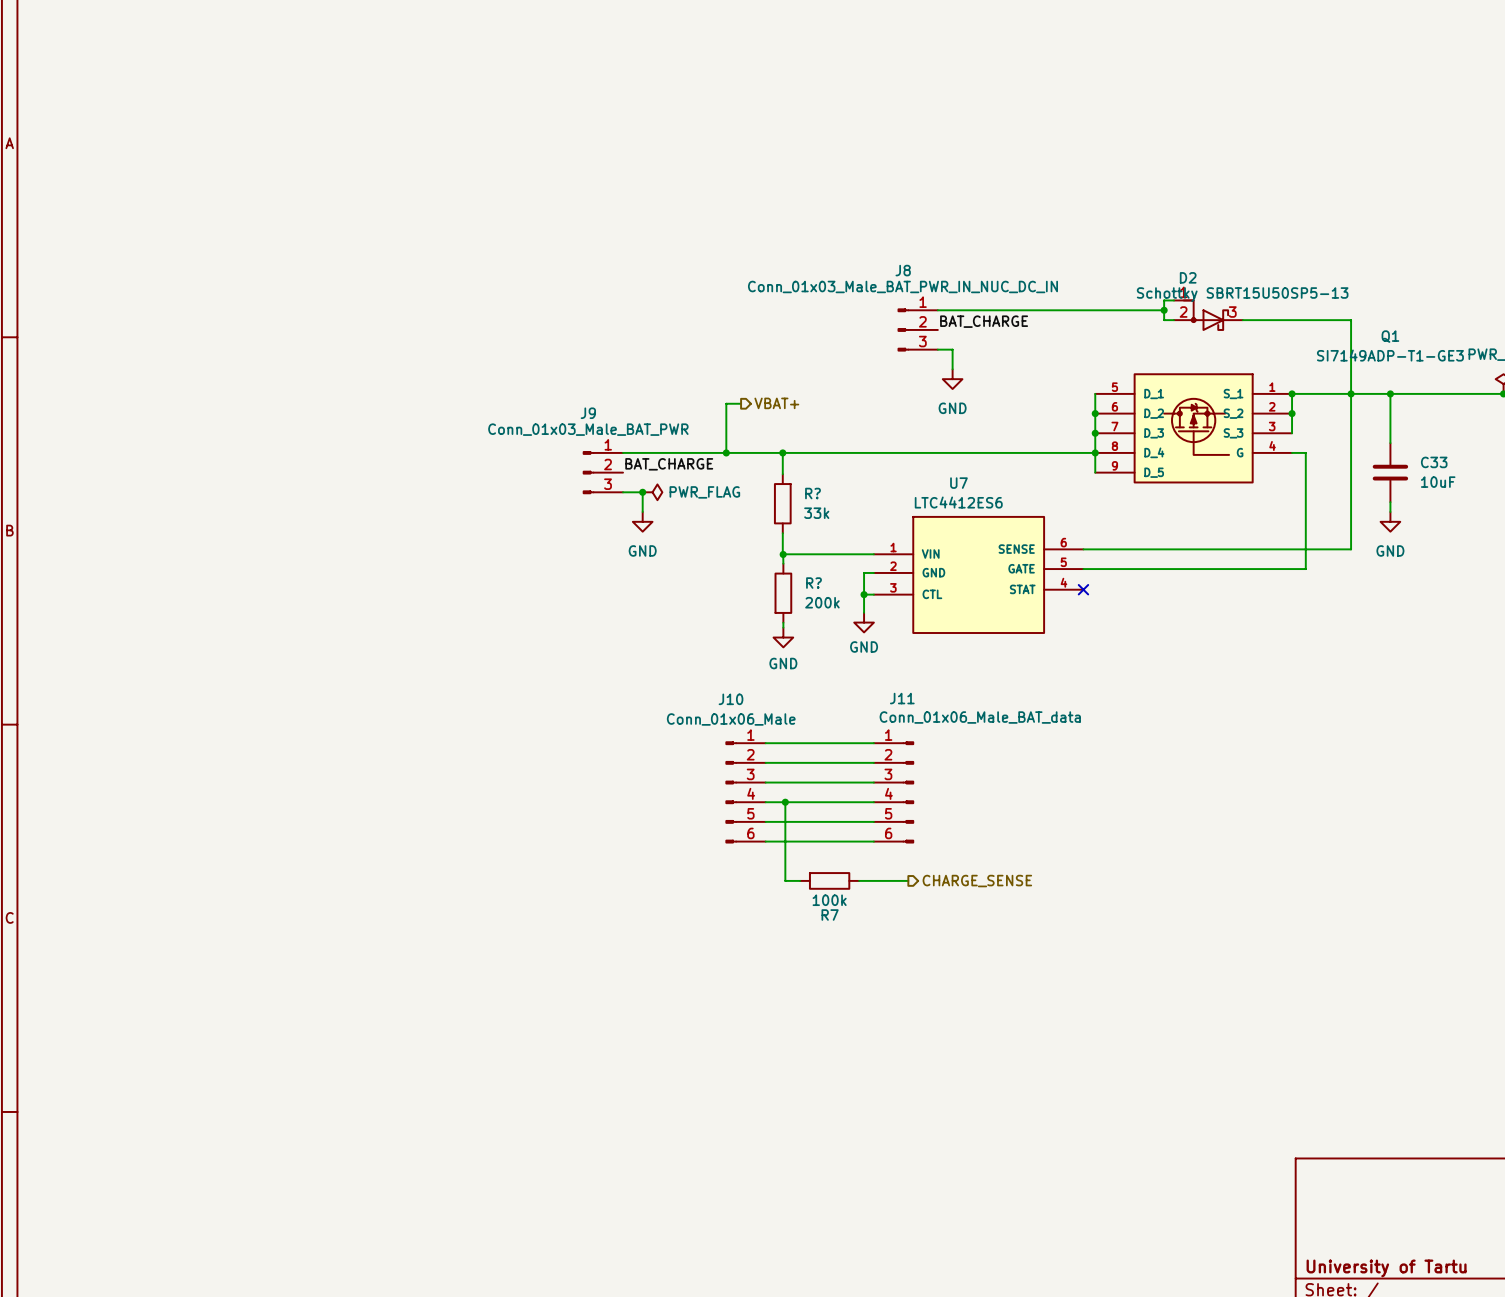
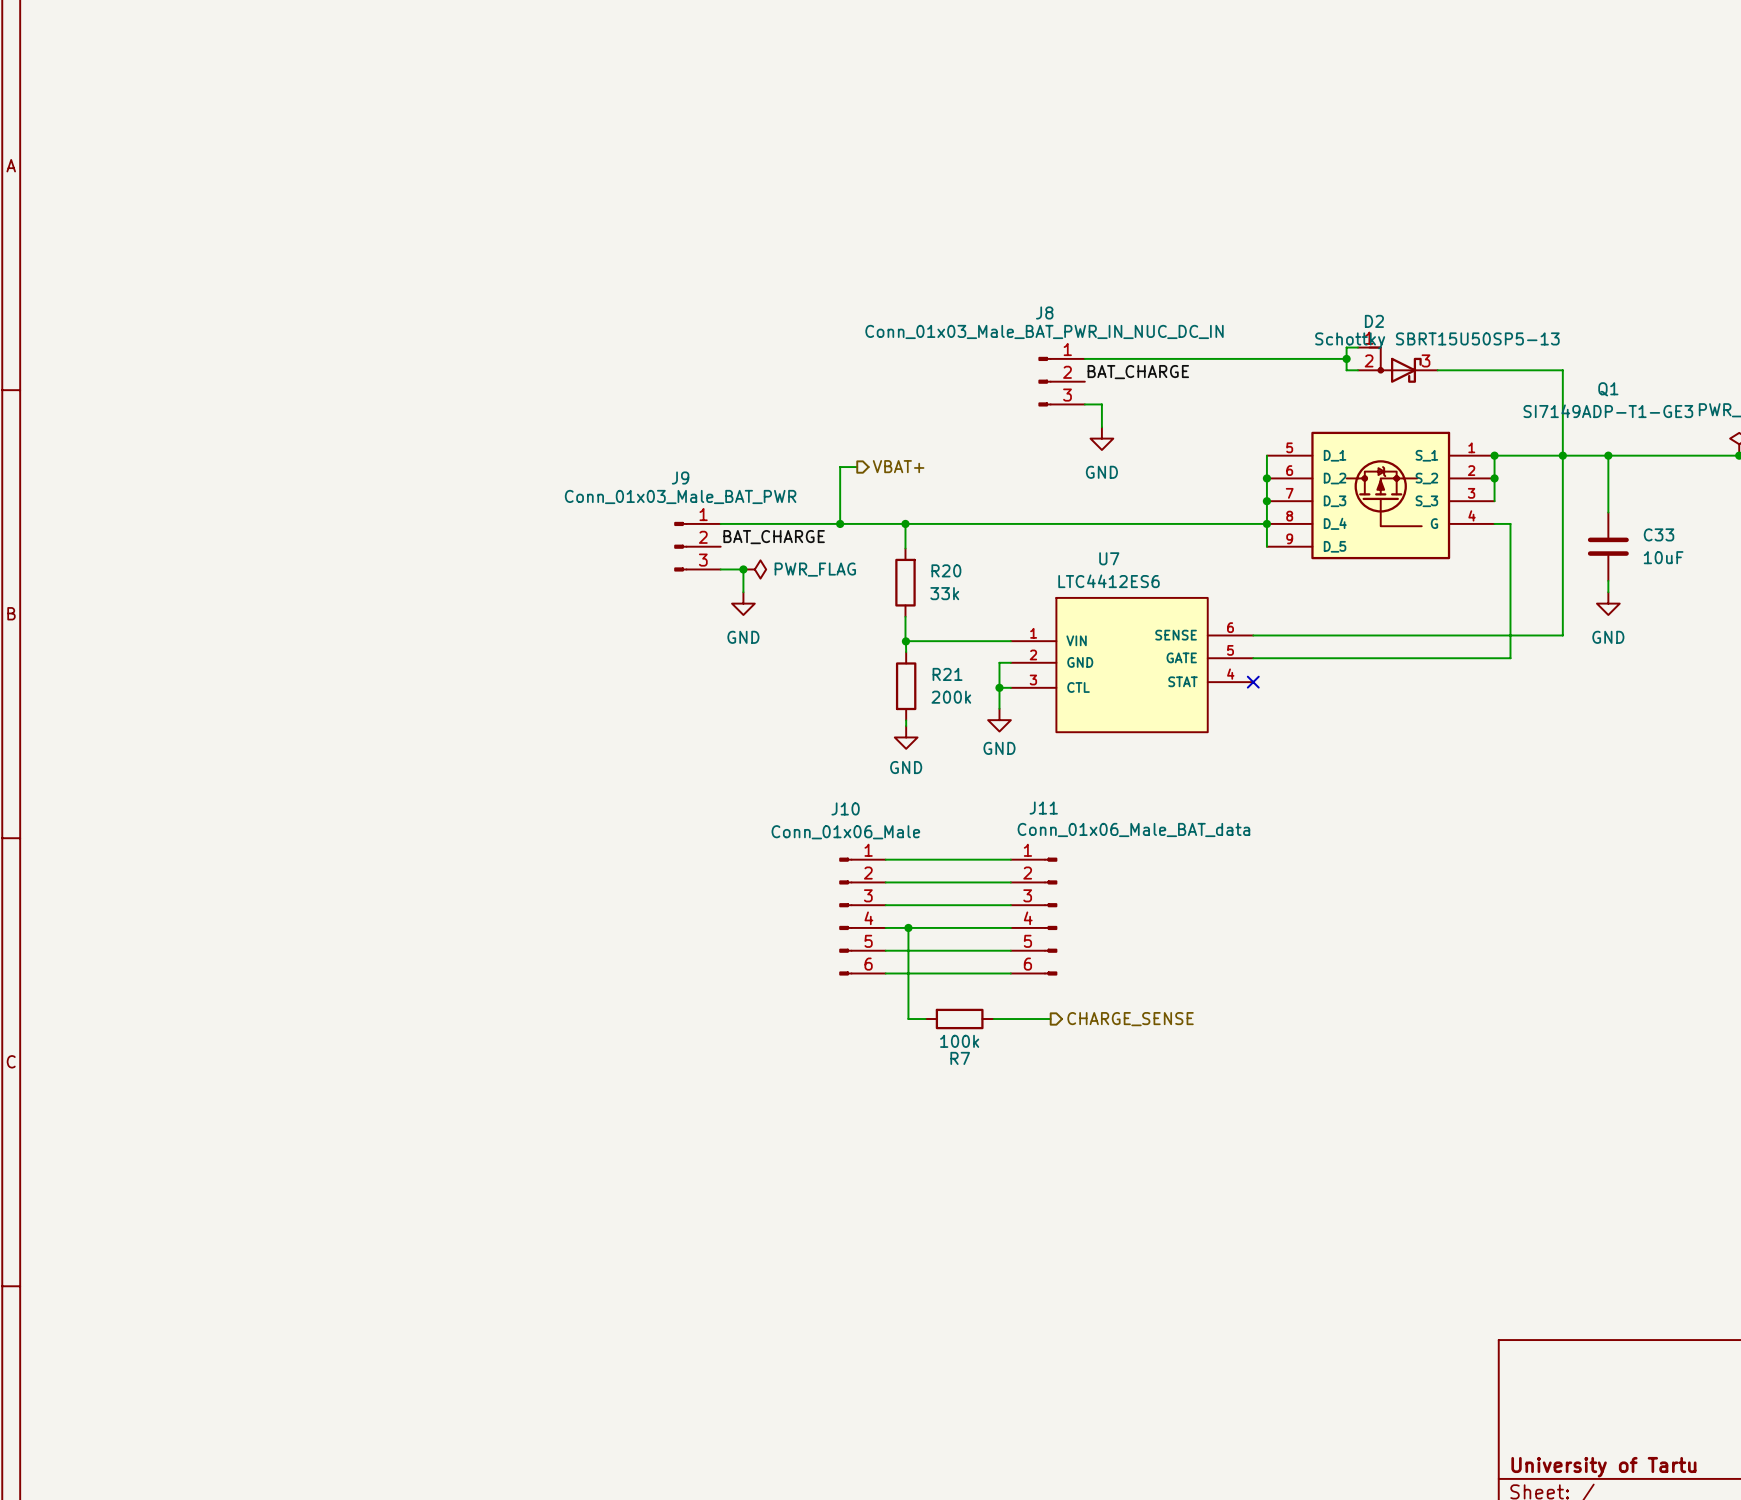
R? name: R? (813, 493) -> R20 (946, 570)
R? name: R? (813, 583) -> R21 (947, 674)

